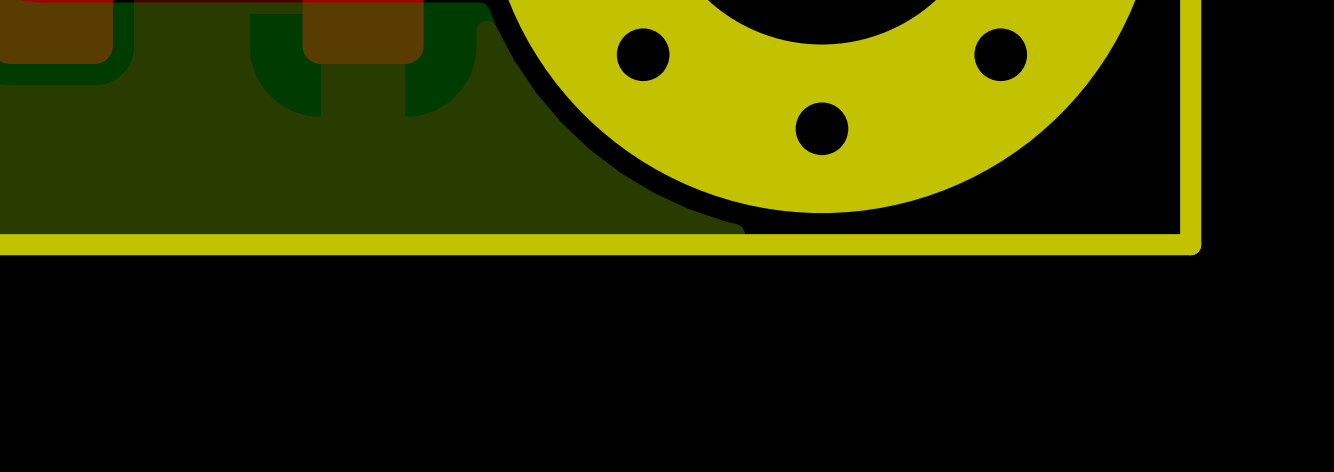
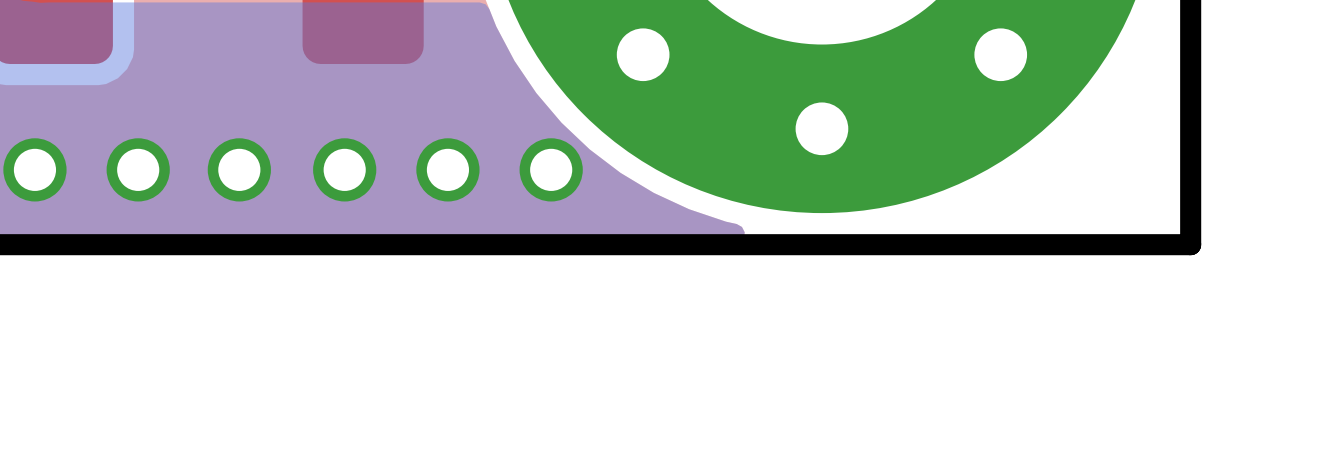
via: none -> (34, 169)
via: none -> (138, 169)
via: none -> (239, 169)
via: none -> (344, 169)
via: none -> (447, 169)
via: none -> (551, 169)

